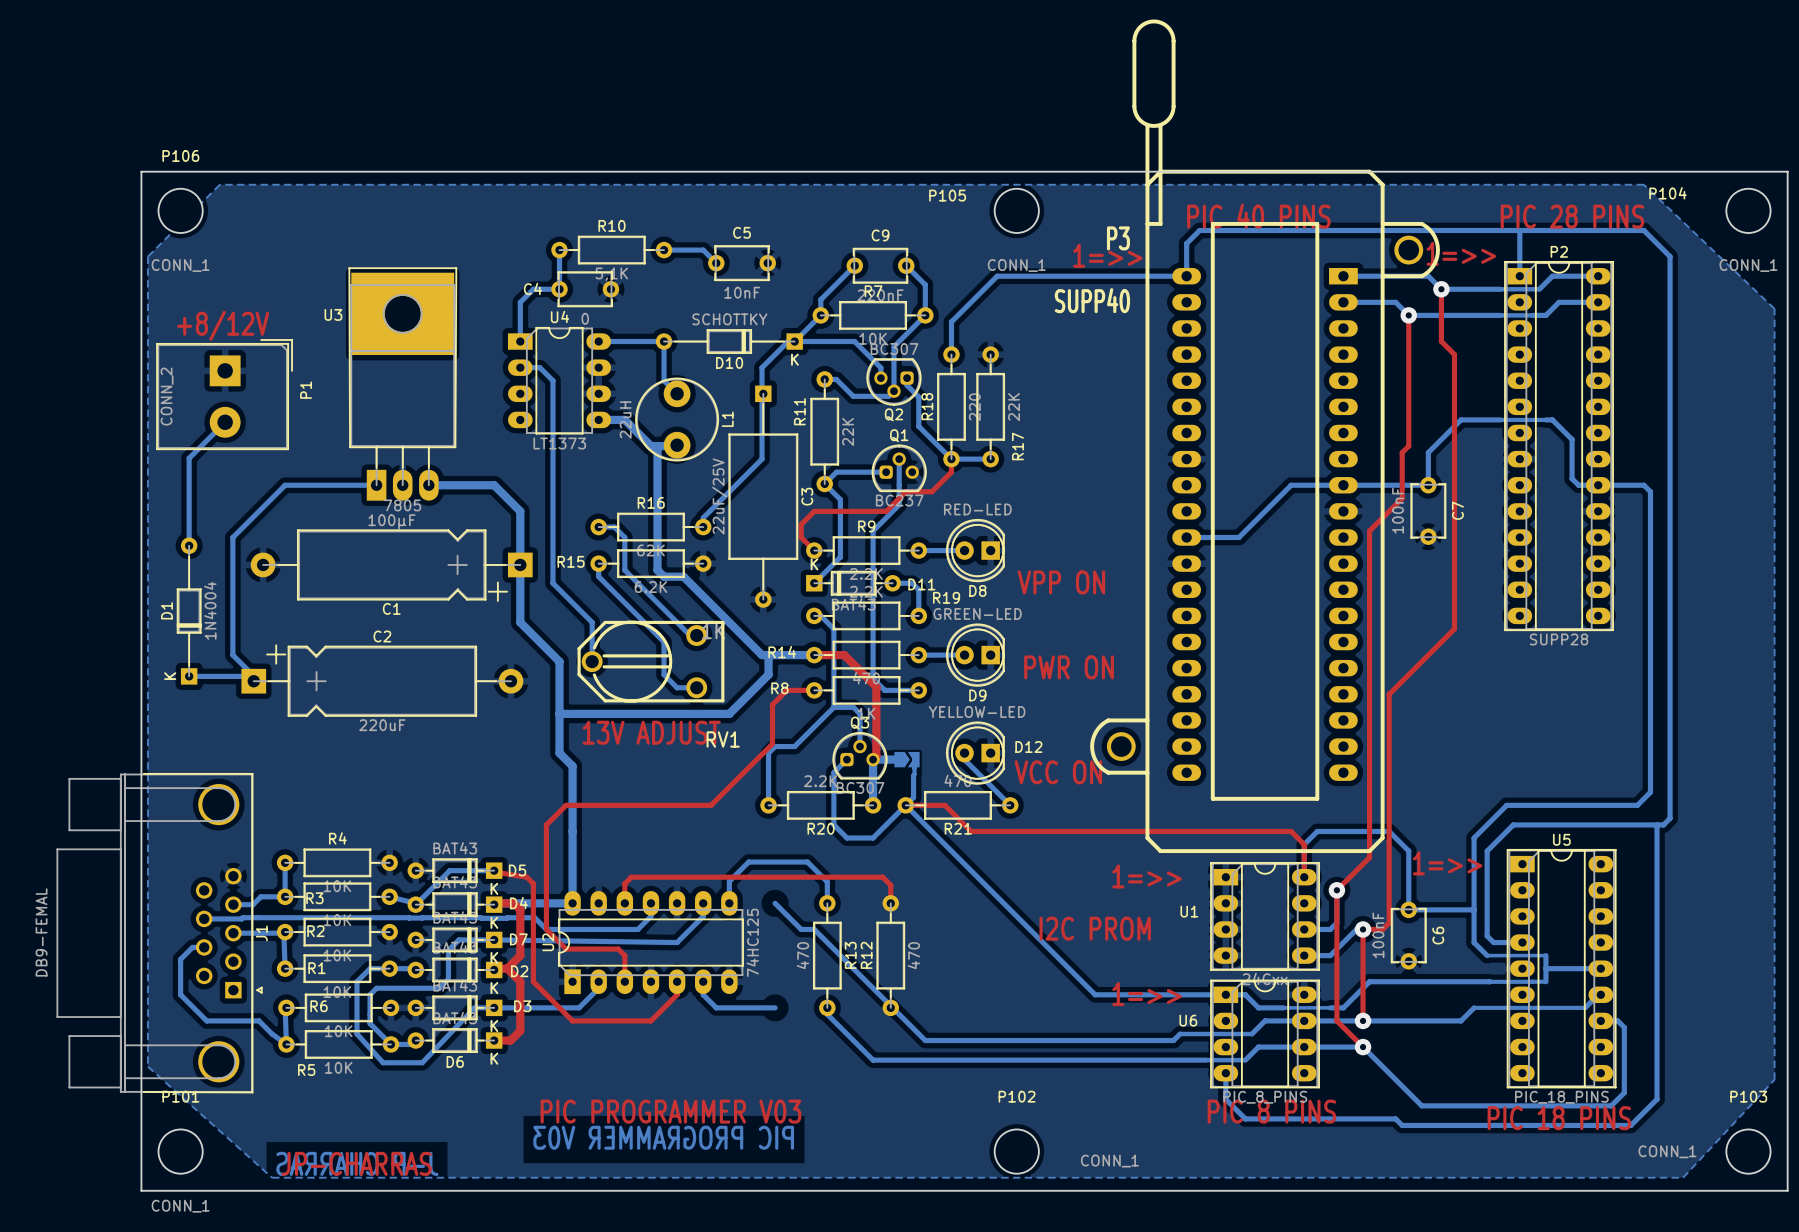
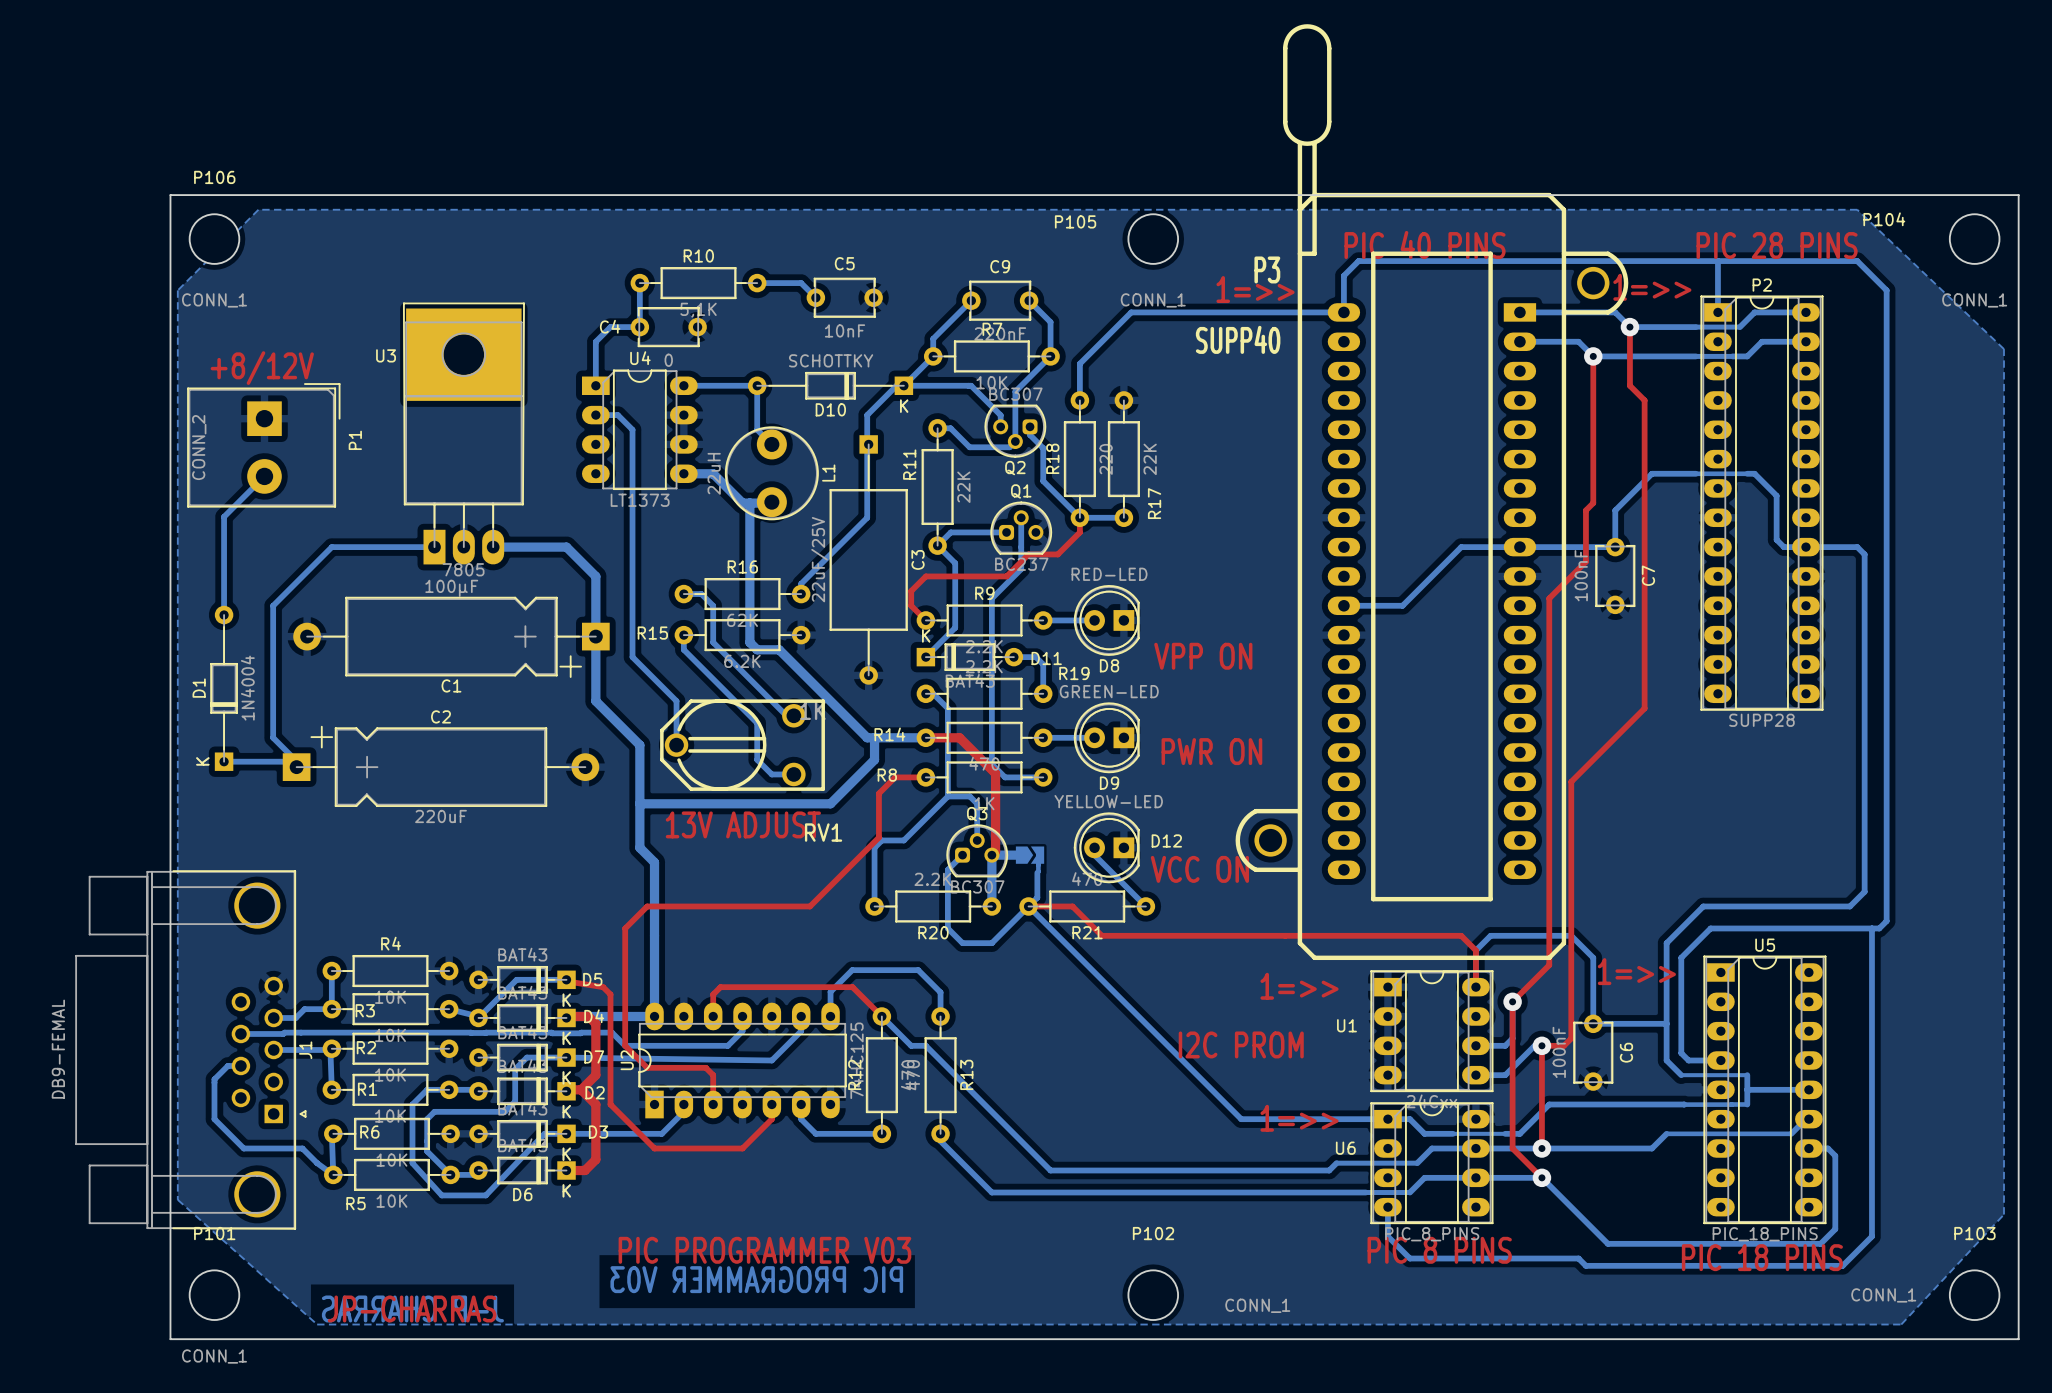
top track: (748, 877) (882, 877) (890, 885) (890, 903) -> (852, 987) (881, 1016)
R12 position: (890, 955) -> (881, 1075)

